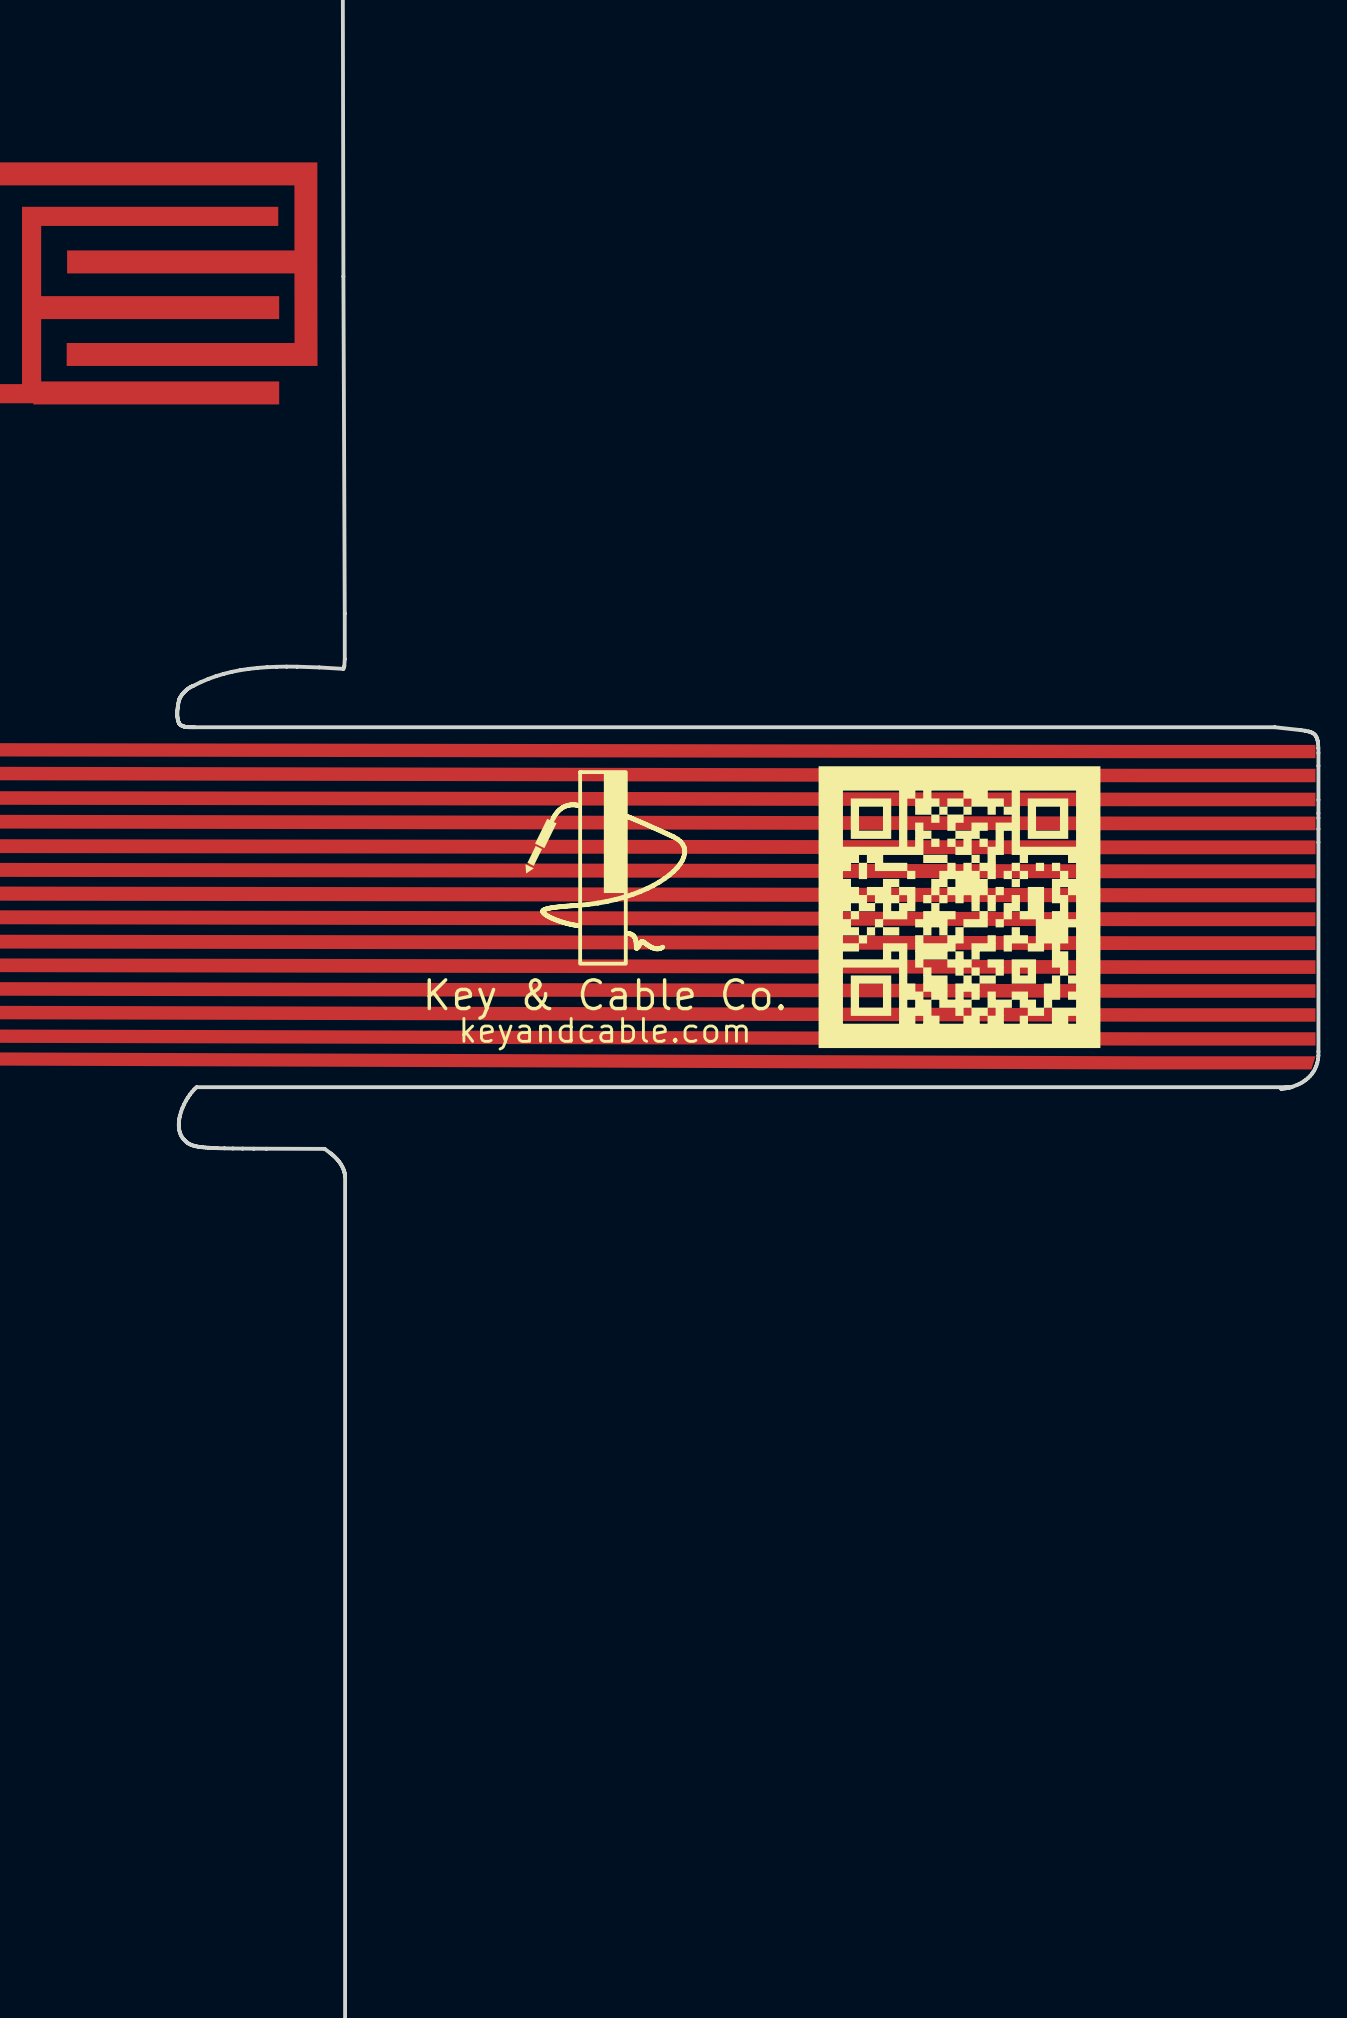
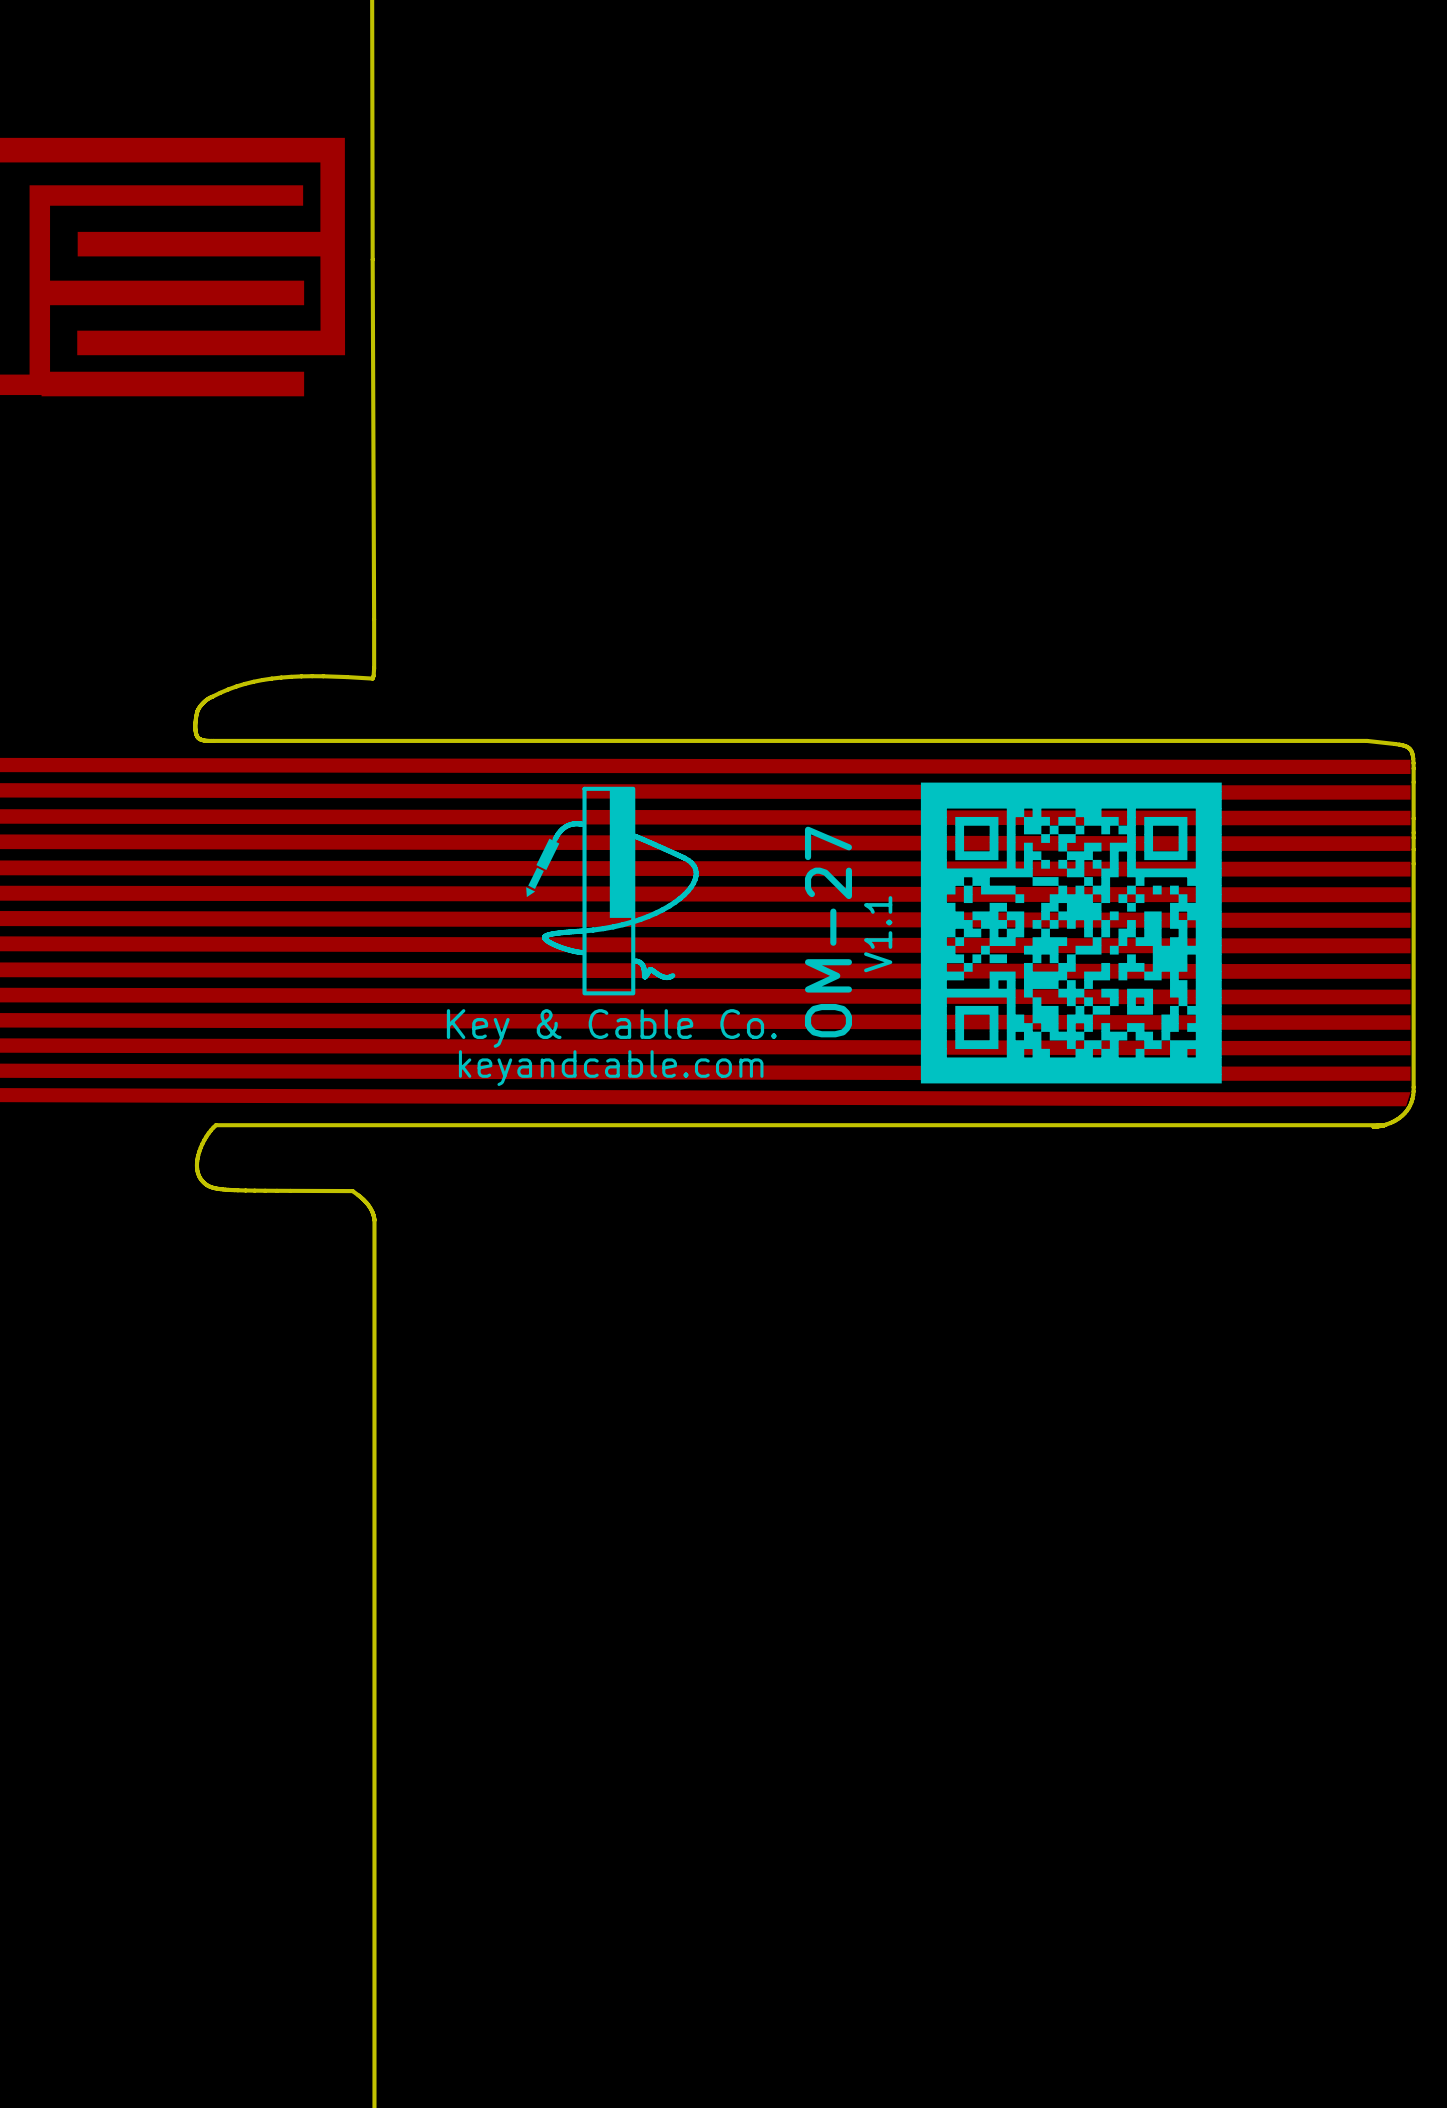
drawing: none -> [526, 786, 699, 996]
drawing: [525, 770, 688, 966] -> none
text: none -> OM-27 (828, 932)
drawing position: (959, 907) -> (1071, 933)
text: none -> V1.1 (878, 934)

